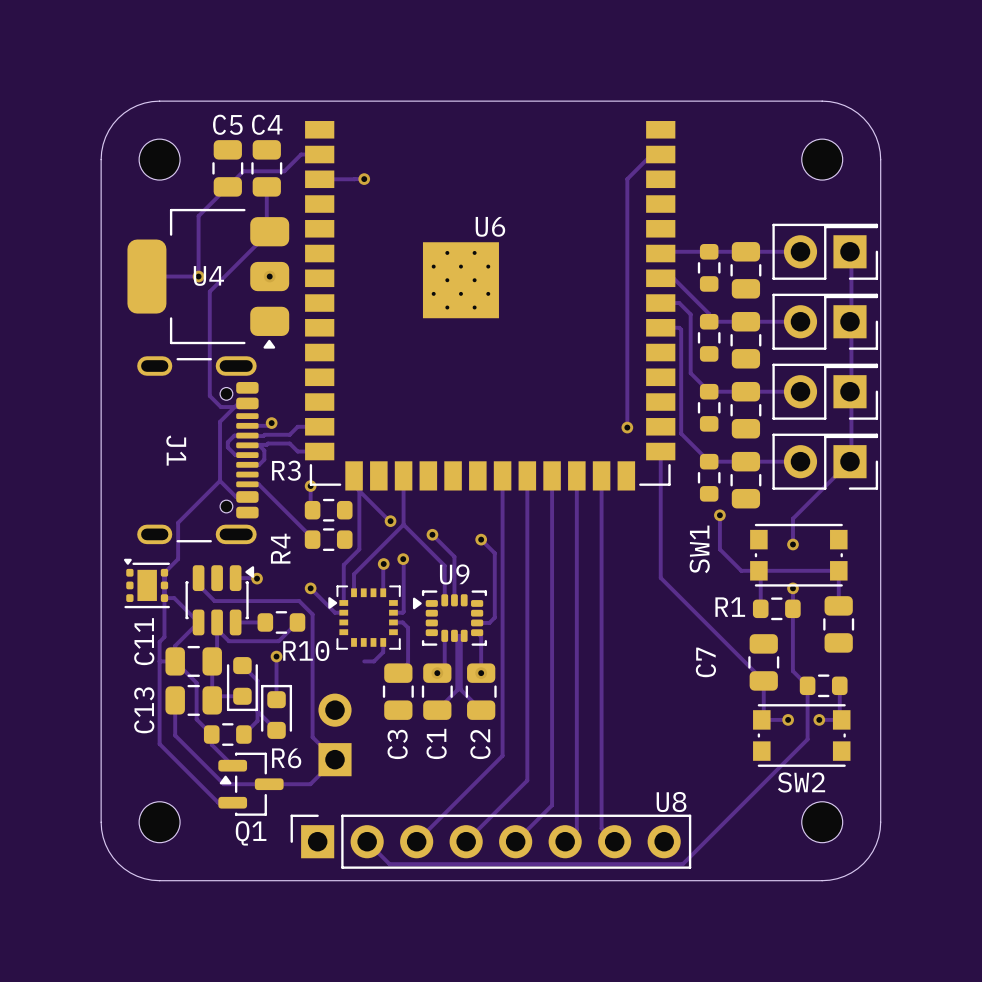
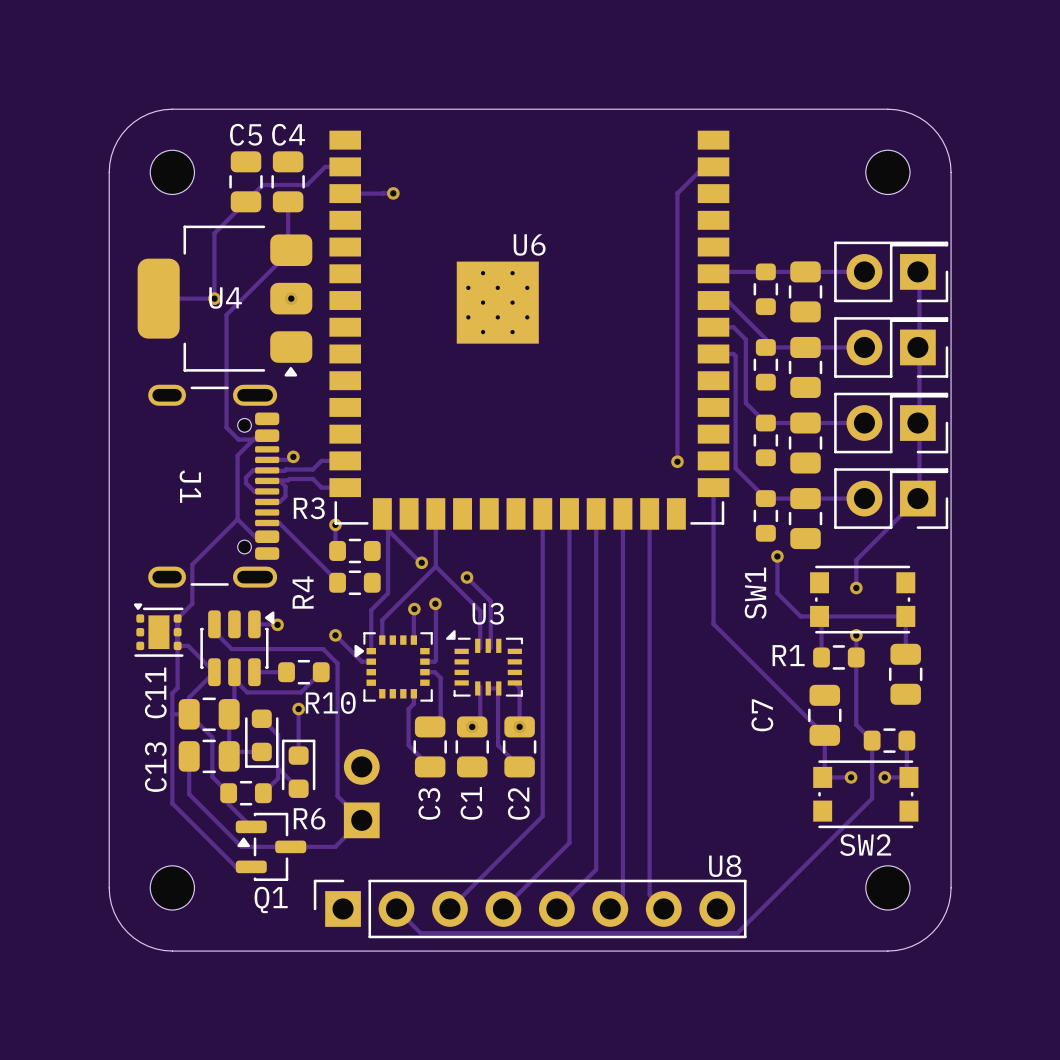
track: (481, 539) (494, 553) (494, 617) (489, 622) (477, 622) -> none
via: (481, 539) -> none
U3: none -> (484, 663)
U9: (449, 618) -> none
track: (383, 651) (373, 661) (364, 661) -> (413, 703) (408, 709) (408, 745) (430, 766)
track: (461, 690) (460, 639) (464, 635) (454, 635) (457, 638) (457, 690) (437, 710) -> (498, 745) (498, 688) (488, 688)

